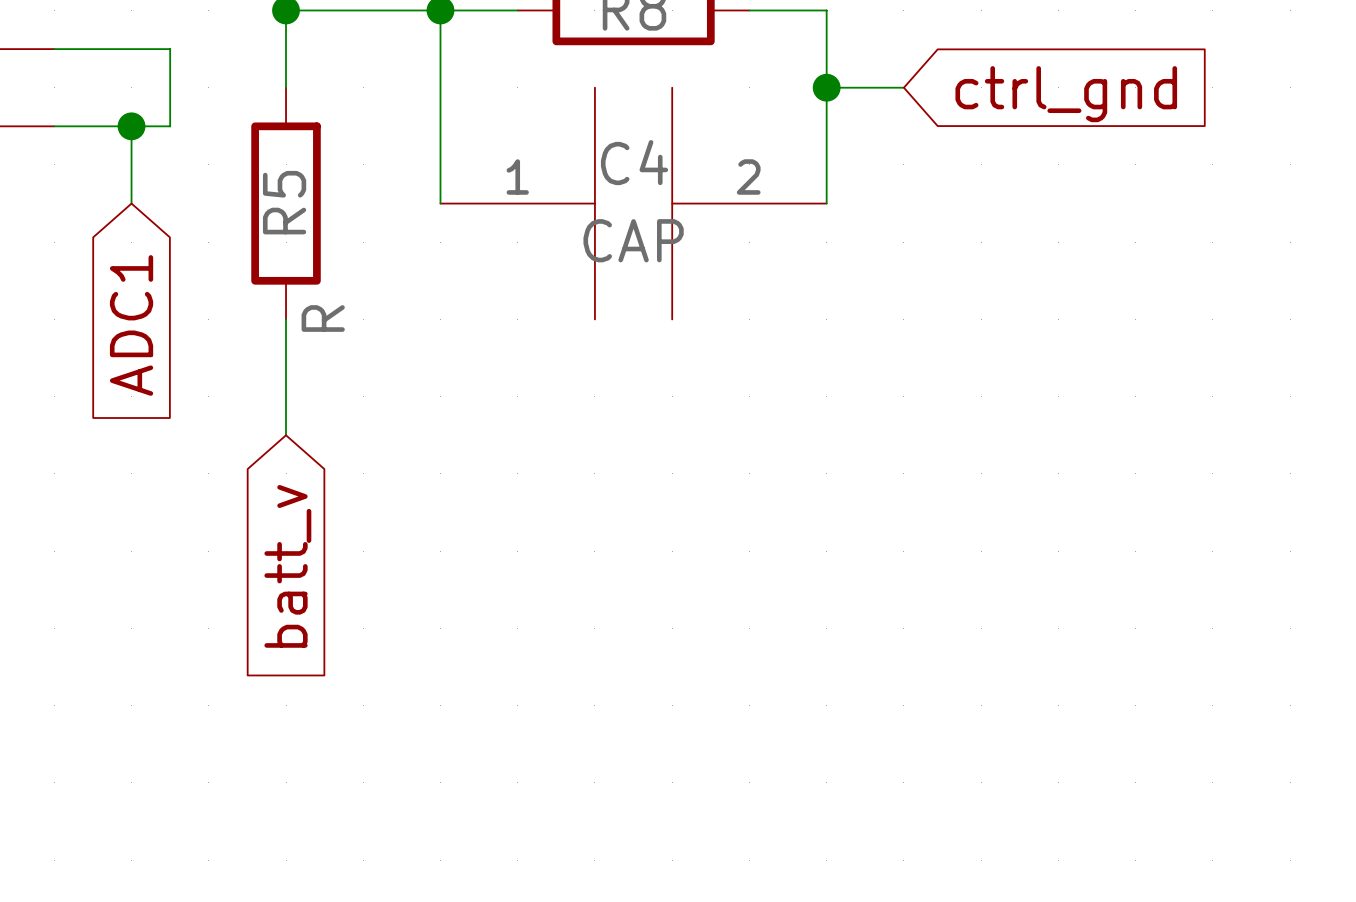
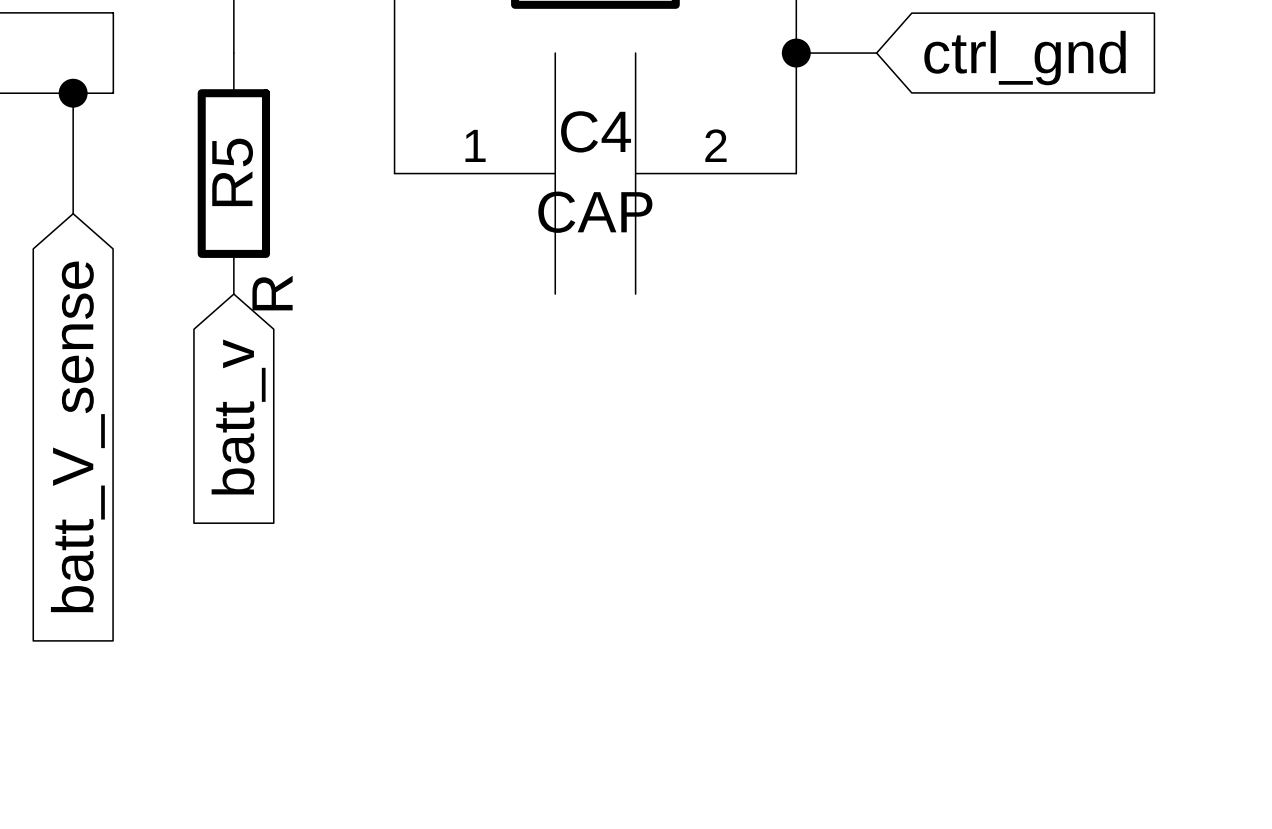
wire: none -> (73, 173) (73, 213)
wire: (286, 319) (286, 435) -> none
global label: ADC1 (131, 325) -> none
global label: none -> batt_V_sense (77, 436)
global label position: batt_v (287, 566) -> batt_v (238, 417)

